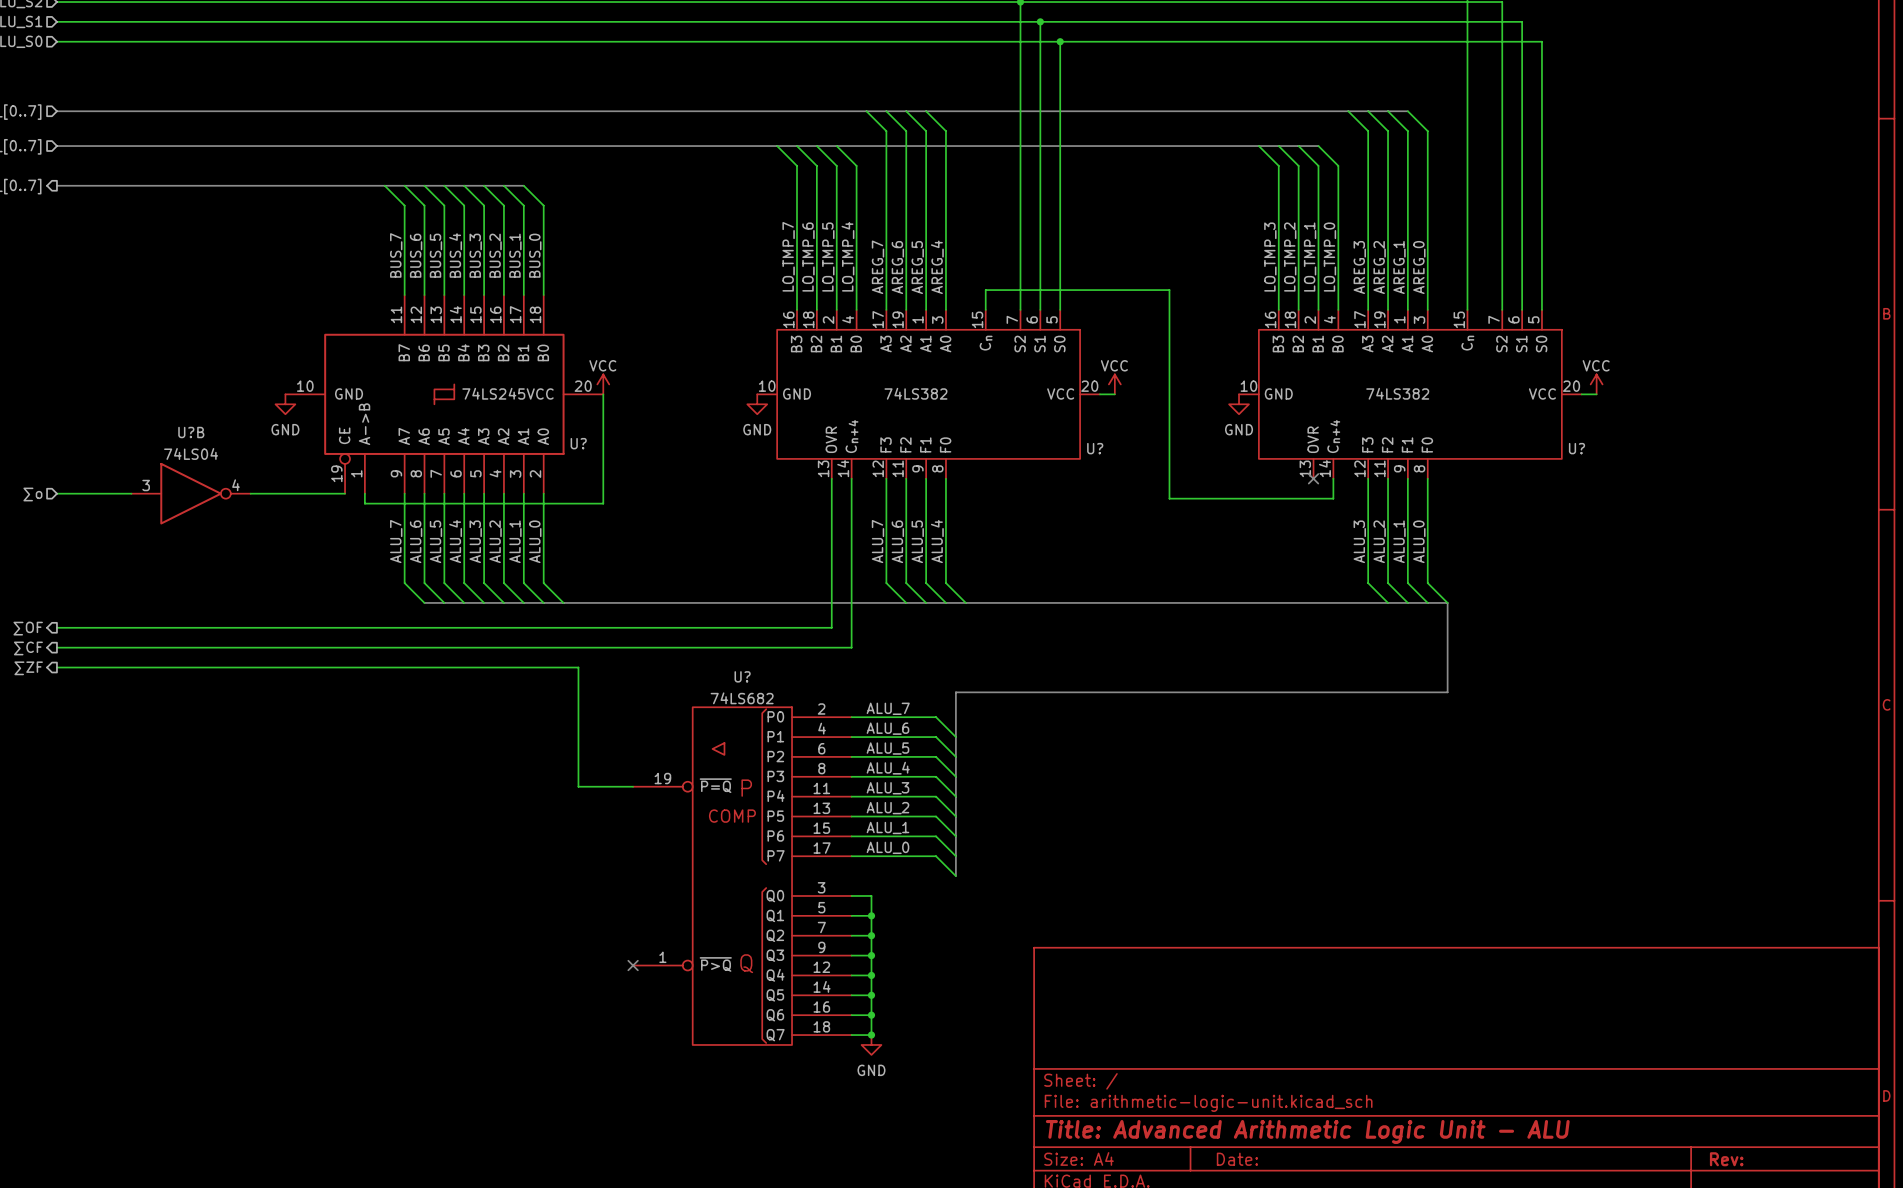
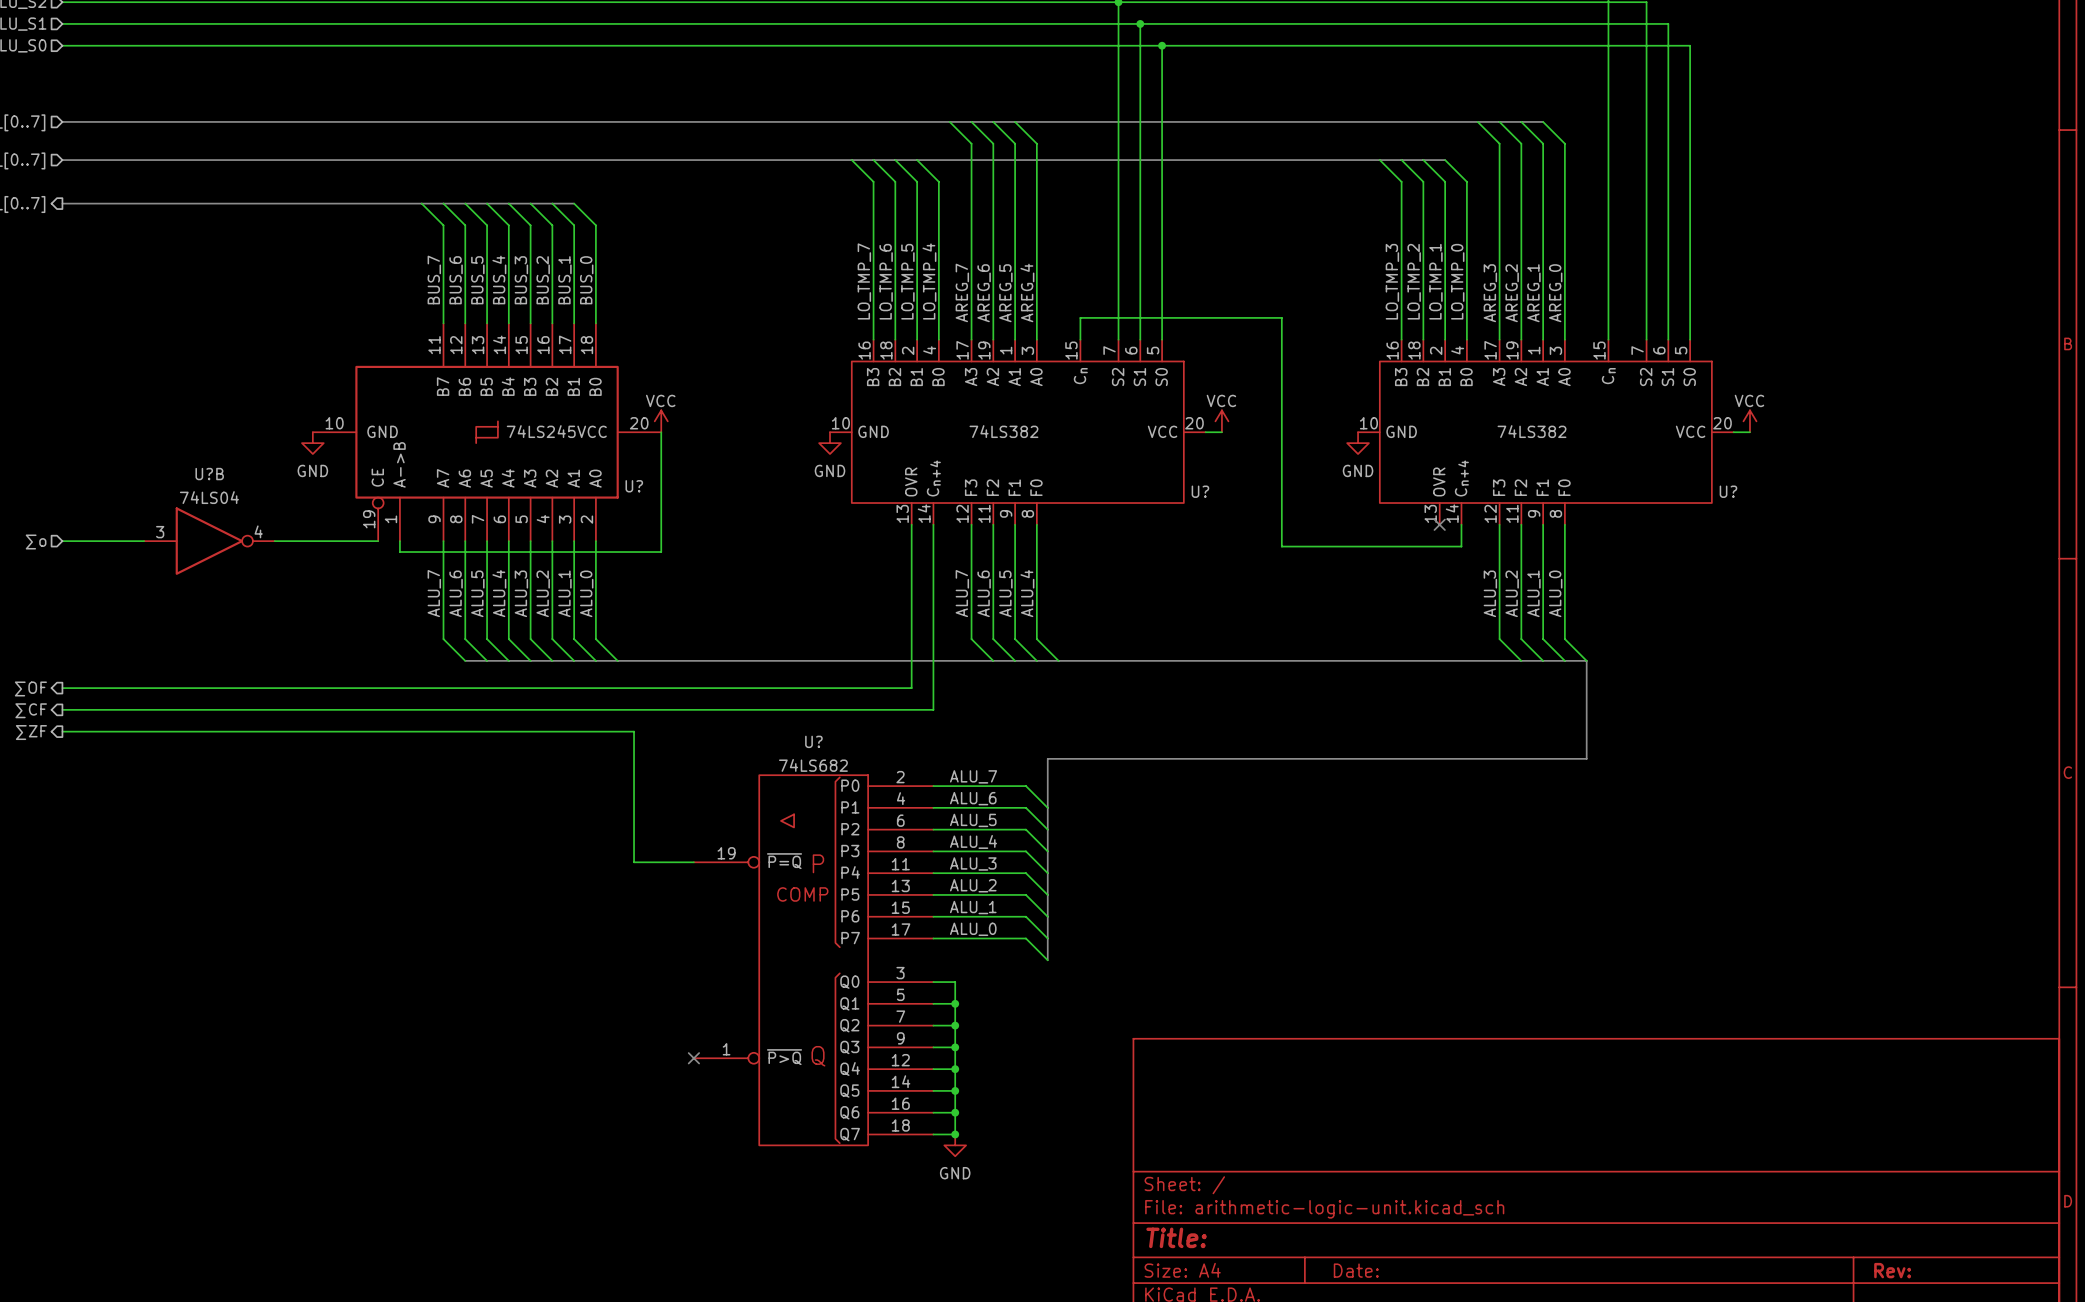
title block: Title: Advanced Arithmetic Logic Unit - ALU (1307, 1131) -> Title: (1176, 1237)

